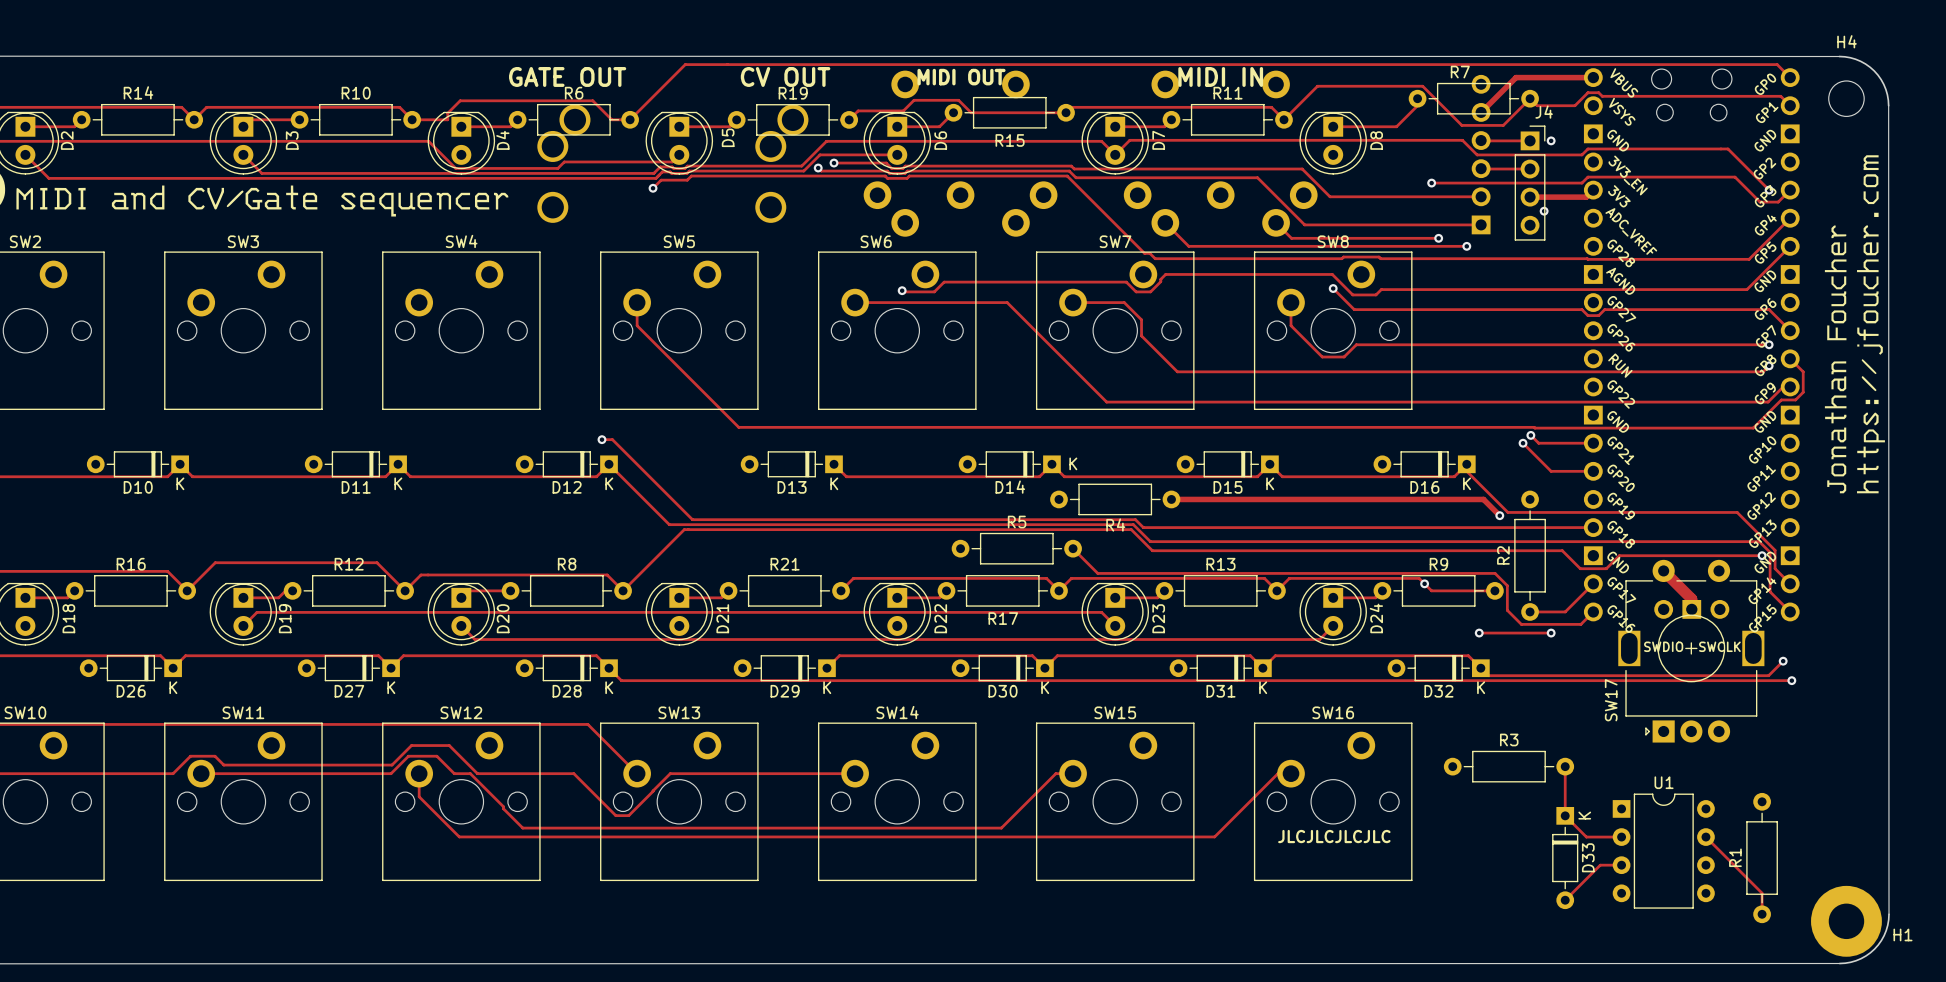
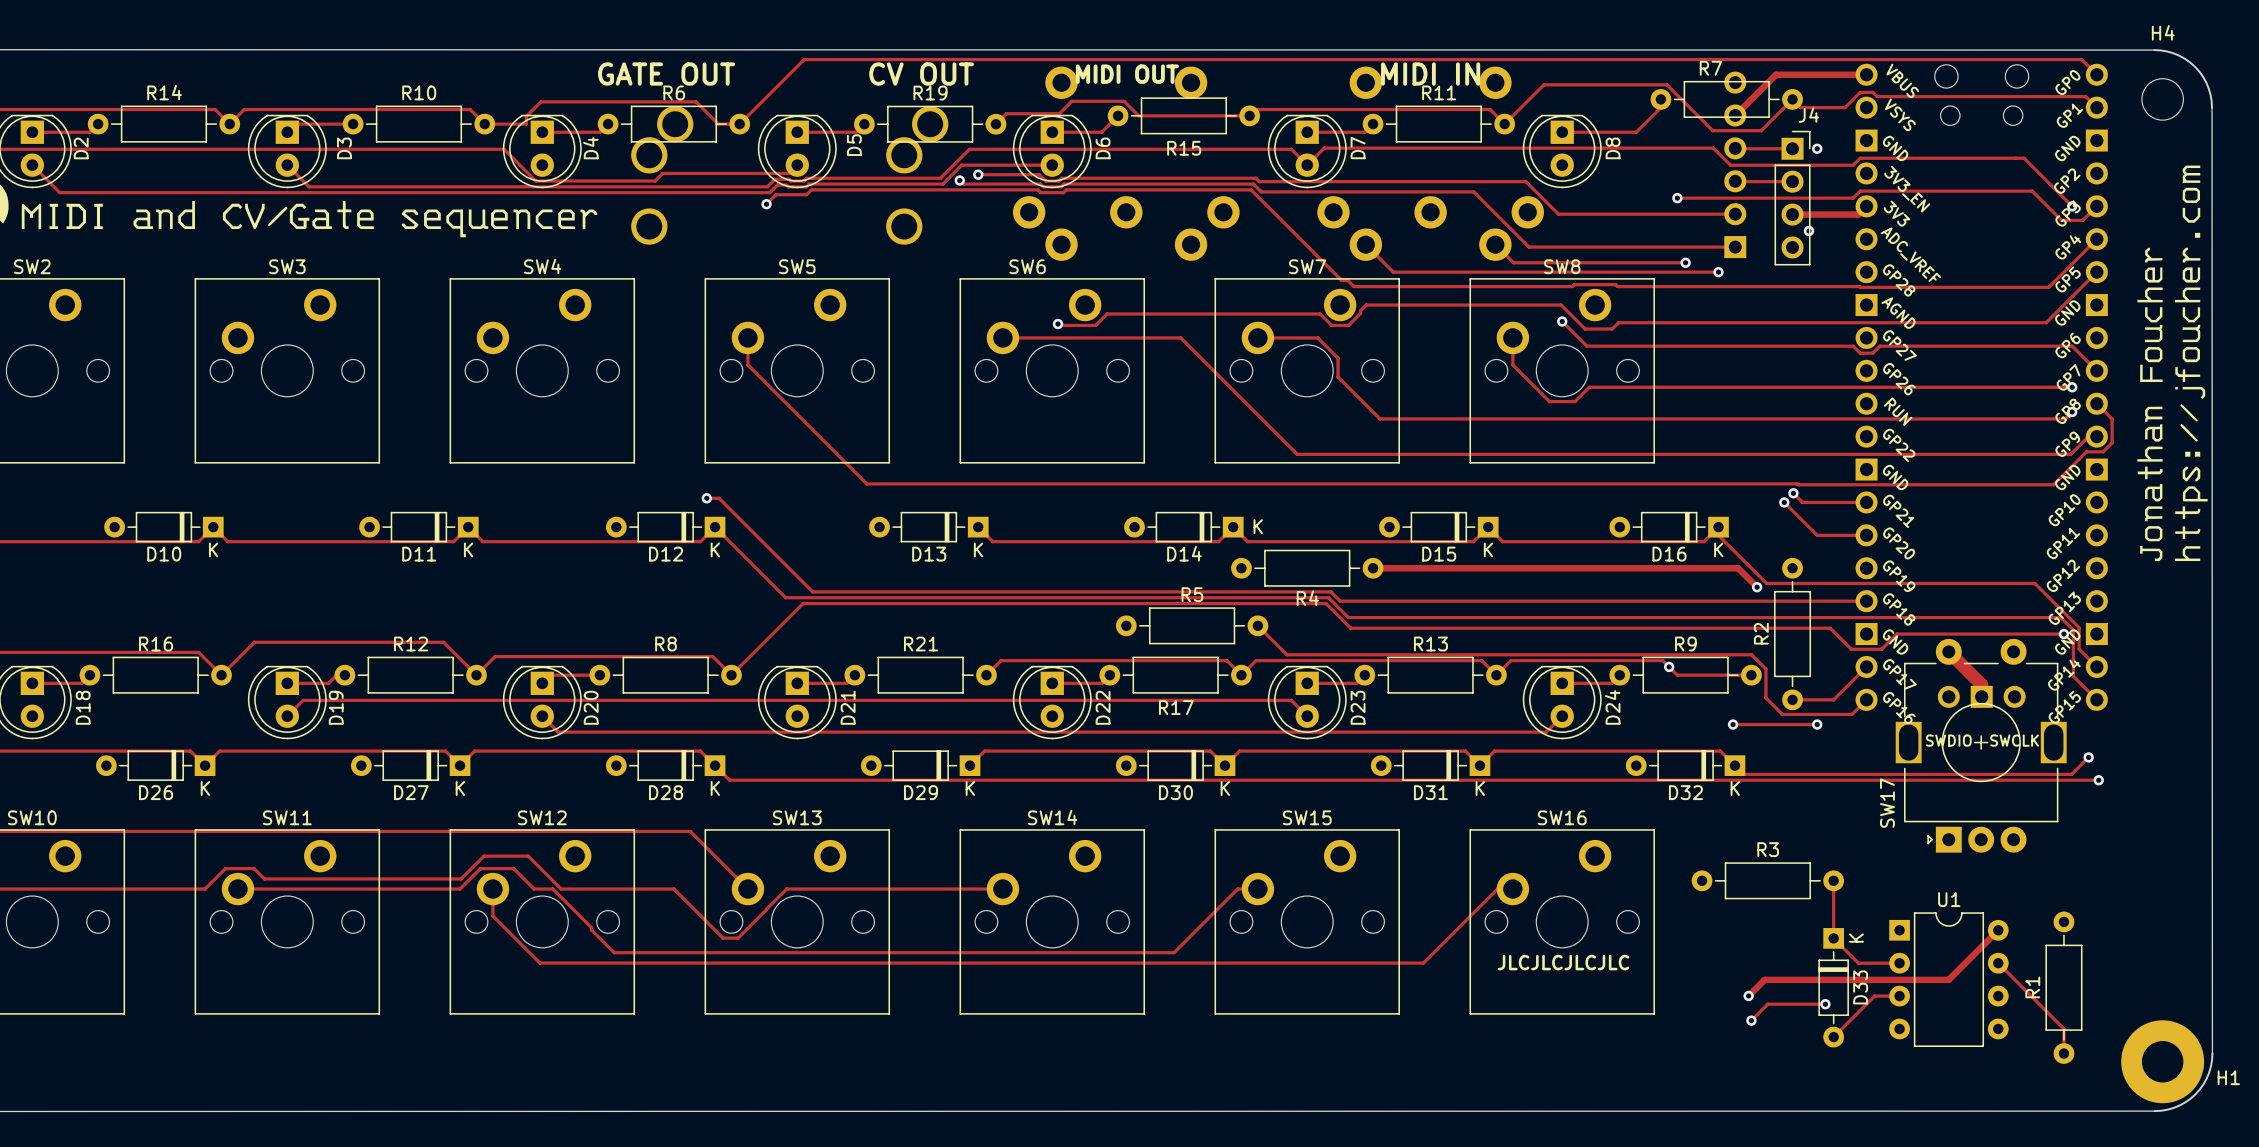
track: none -> (1998, 930) (1948, 979) (1764, 979) (1748, 995)
via: none -> (1748, 995)
track: none -> (1825, 1004) (1767, 1004) (1751, 1020)
via: none -> (1825, 1004)
via: none -> (1751, 1020)

